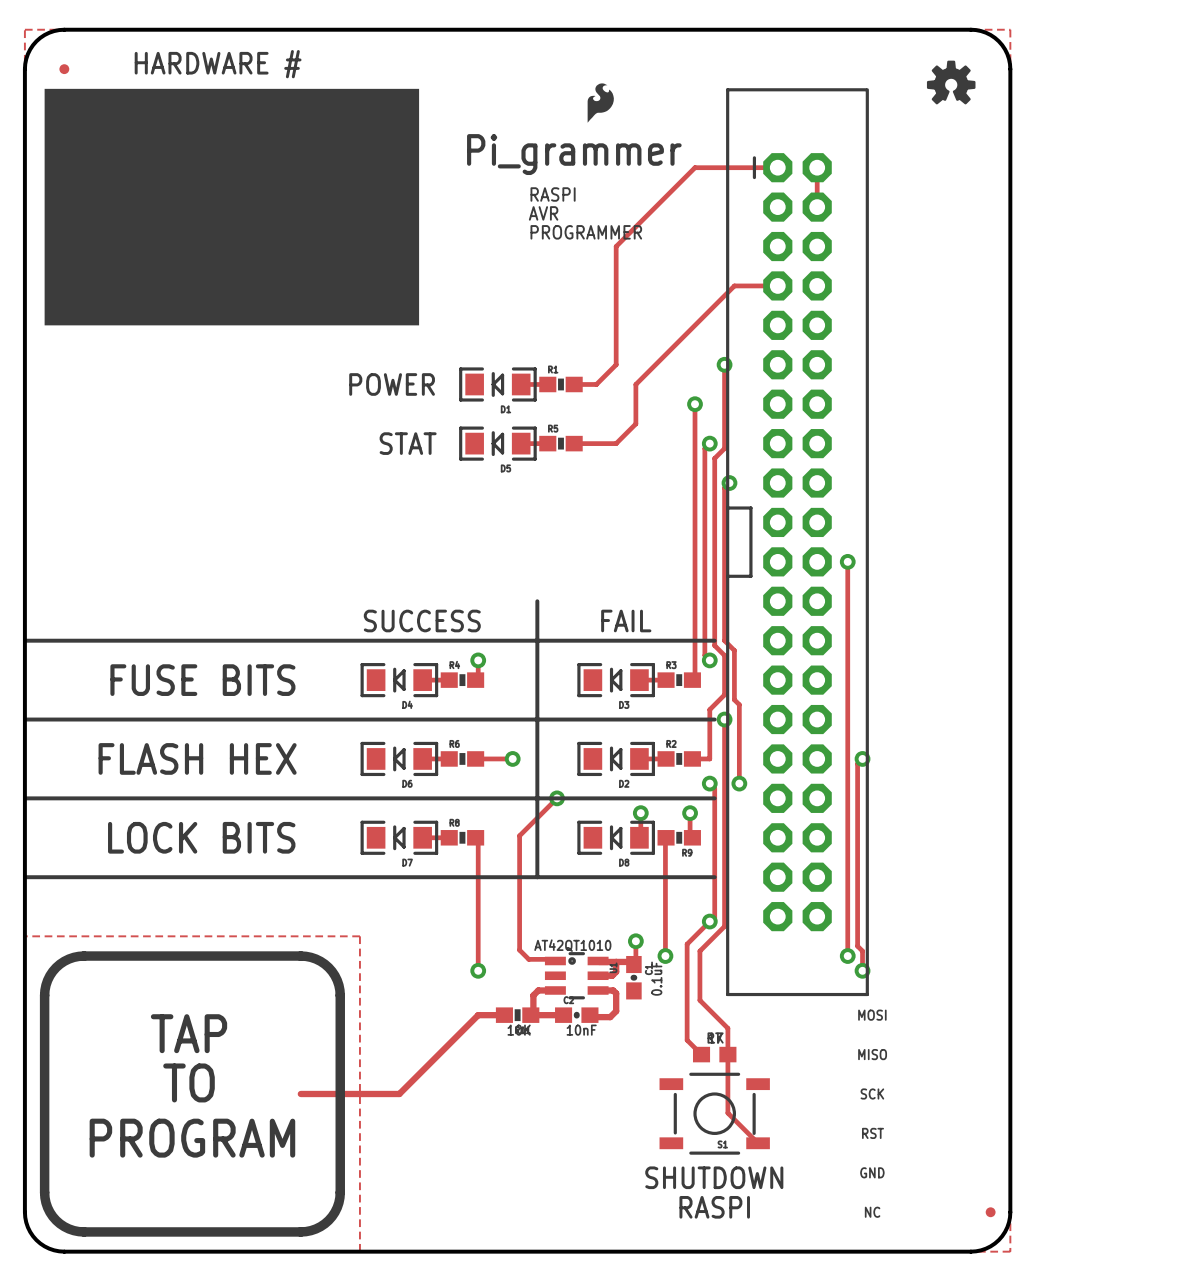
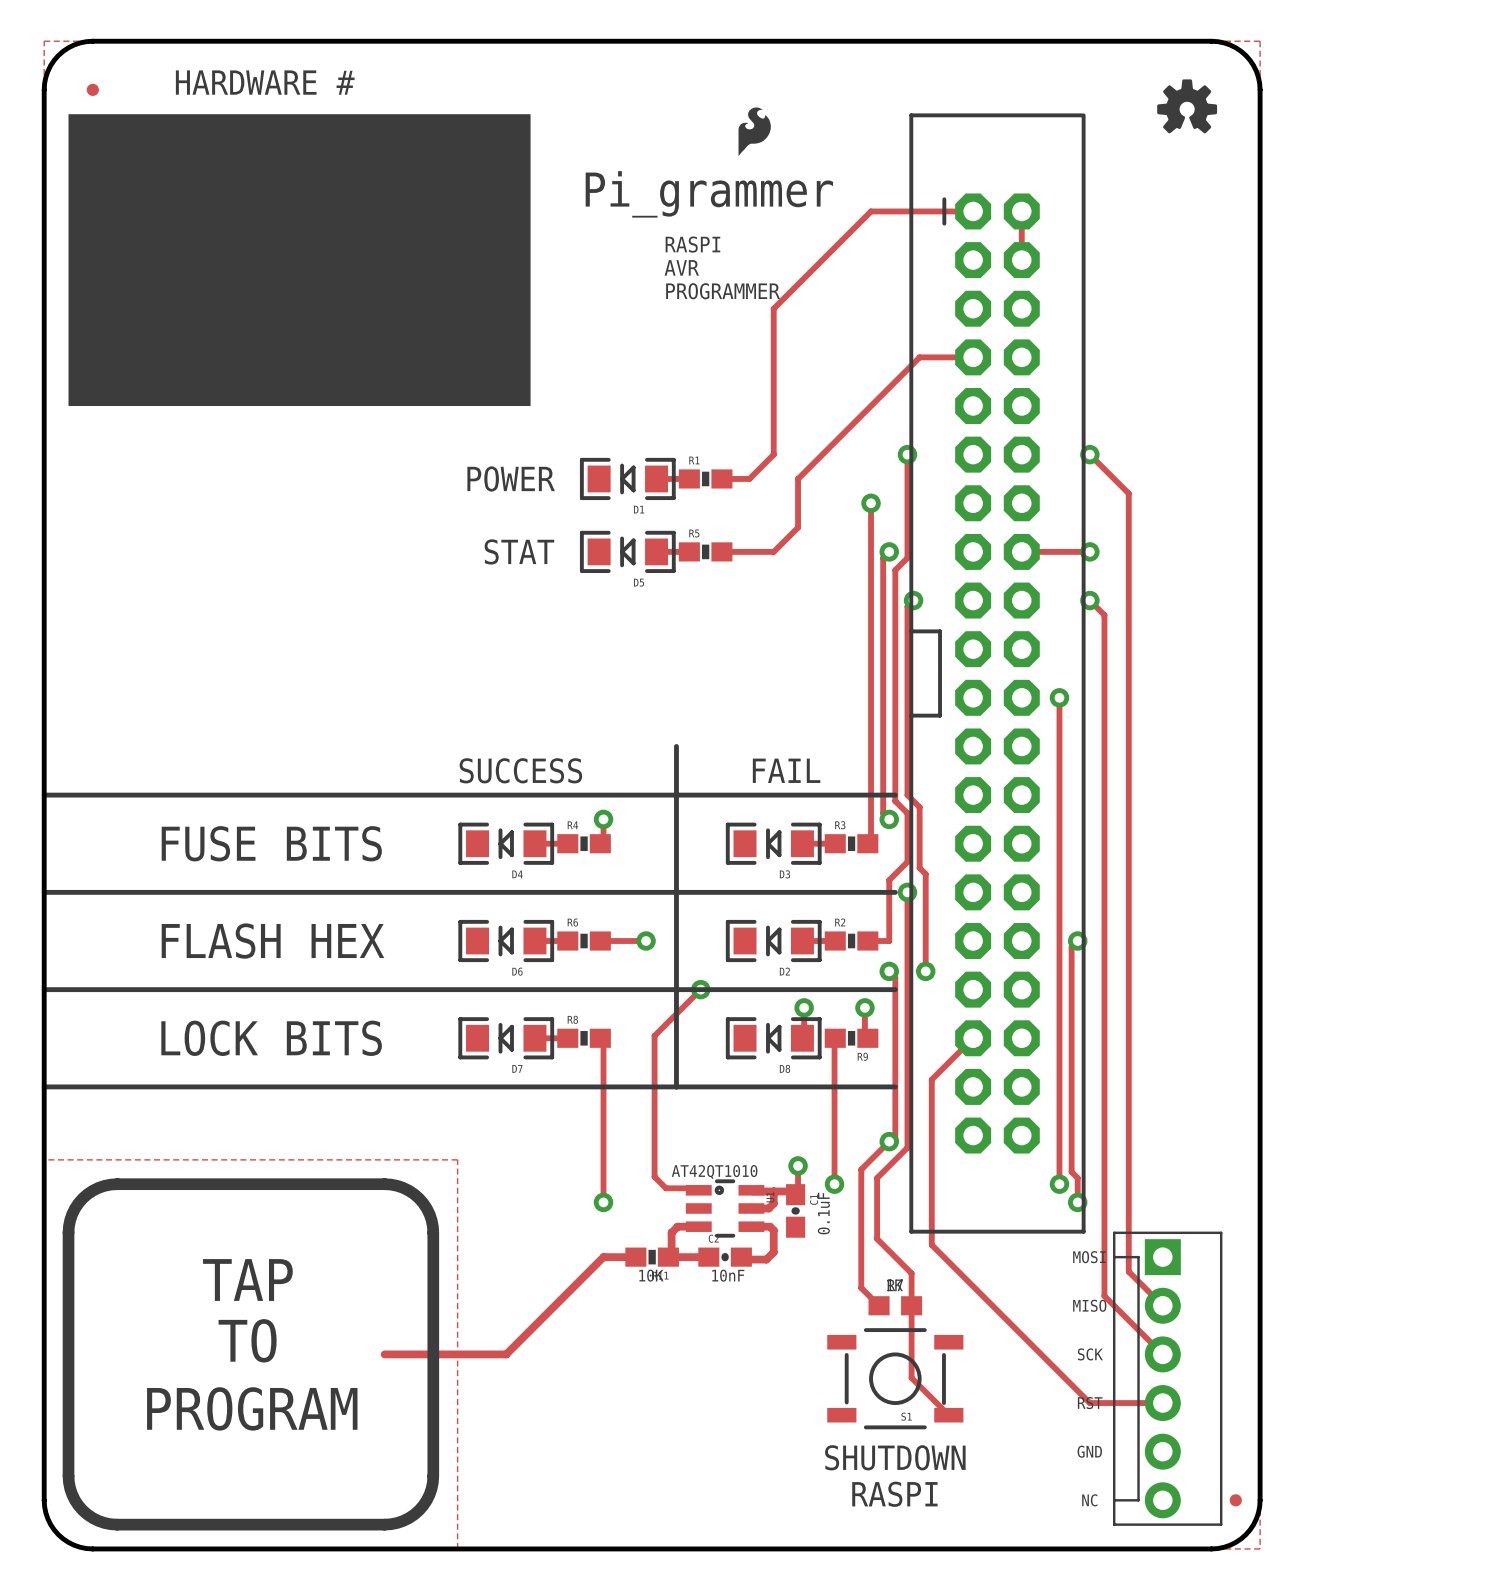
track: none -> (1089, 454) (1128, 493) (1128, 1271) (1162, 1305)
via: none -> (1089, 454)
track: none -> (1021, 551) (1089, 551)
via: none -> (1089, 551)
track: none -> (1089, 600) (1104, 615) (1104, 1296) (1162, 1354)
via: none -> (1089, 600)
track: none -> (973, 1038) (931, 1079) (931, 1244) (1089, 1403) (1162, 1403)
part: none -> (1167, 1378)

